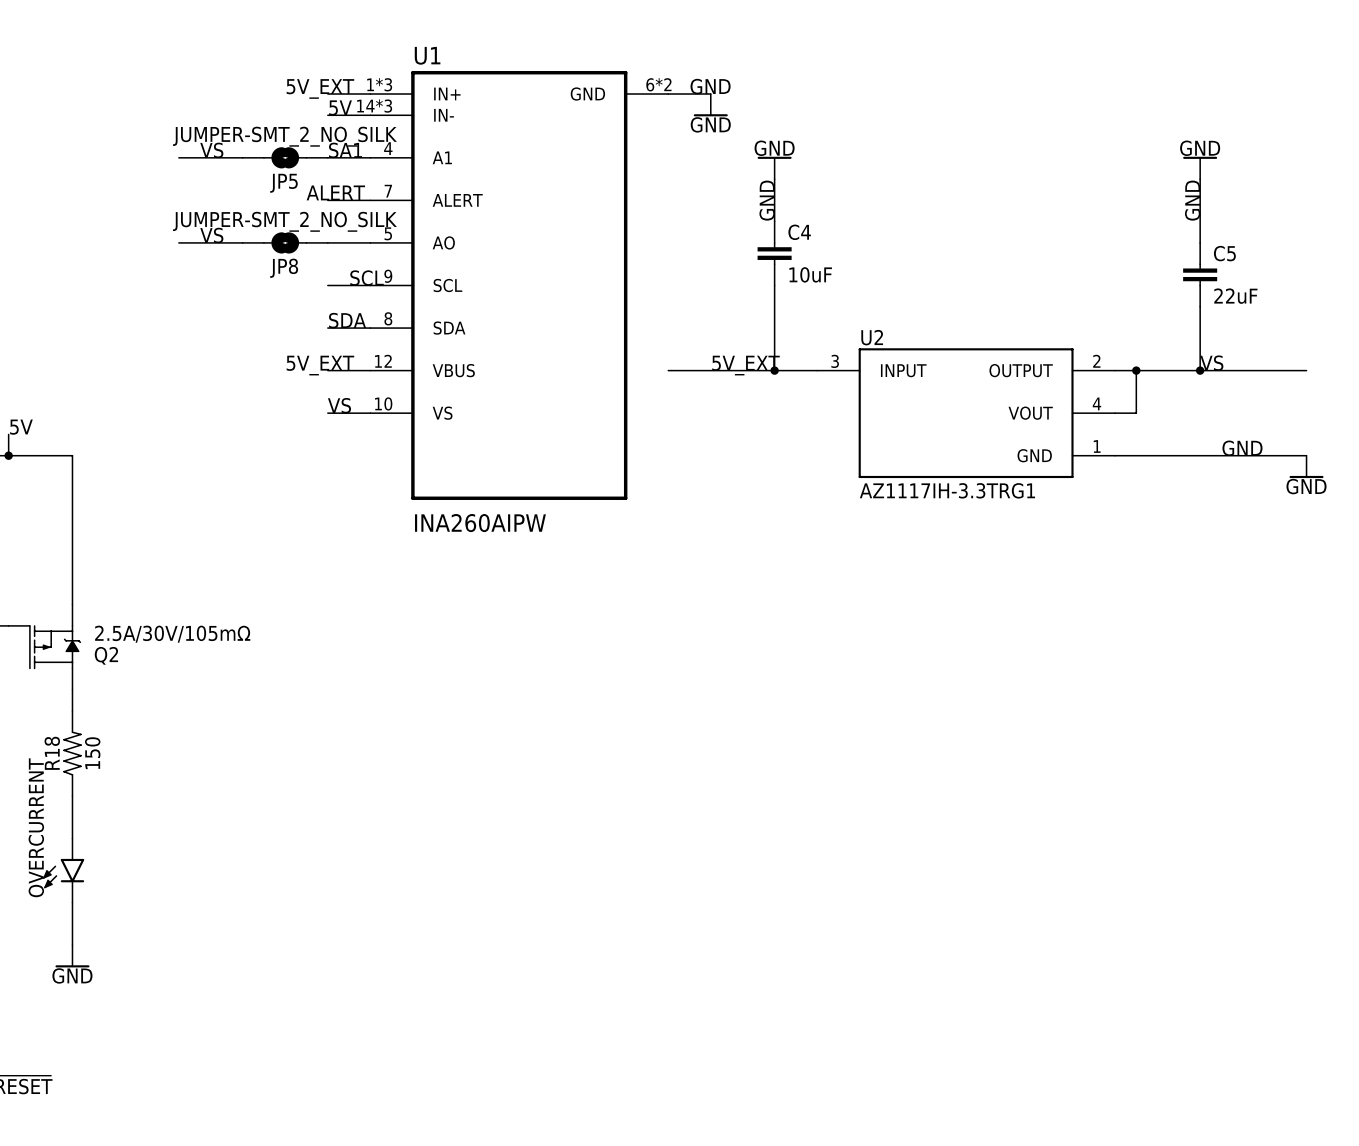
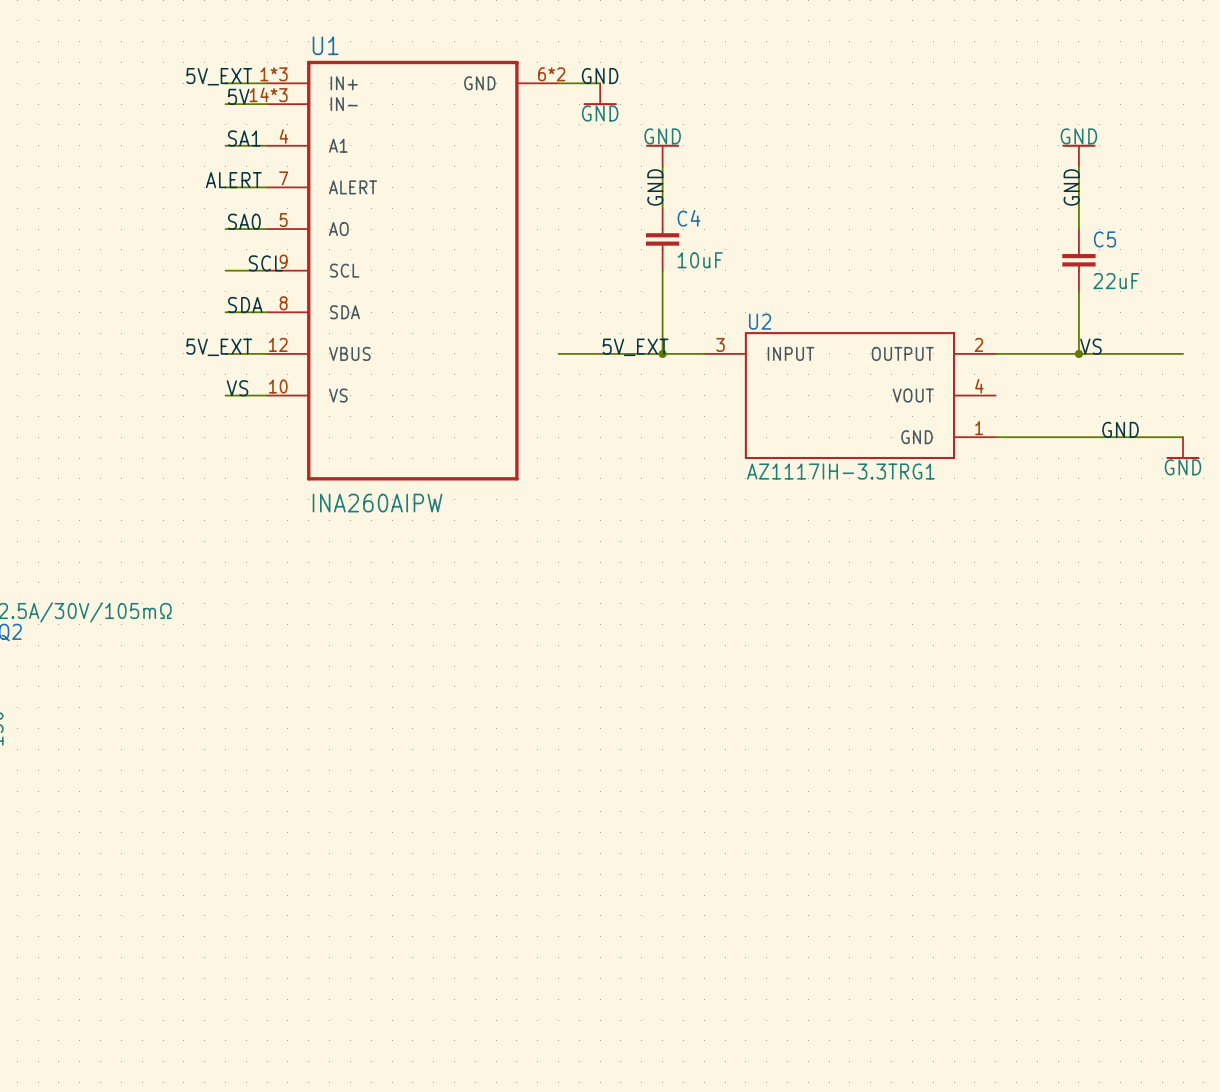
label: VS (211, 150) -> none
wire: (178, 157) (242, 157) -> none
JP5: JUMPER-SMT_2_NO_SILK (285, 157) -> none
label: VS (211, 235) -> none
label: none -> SA0 (244, 221)
wire: (178, 242) (242, 242) -> none
JP8: JUMPER-SMT_2_NO_SILK (285, 242) -> none
wire: (1136, 370) (1136, 413) (1115, 413) -> none
junction: (1136, 370) -> none

